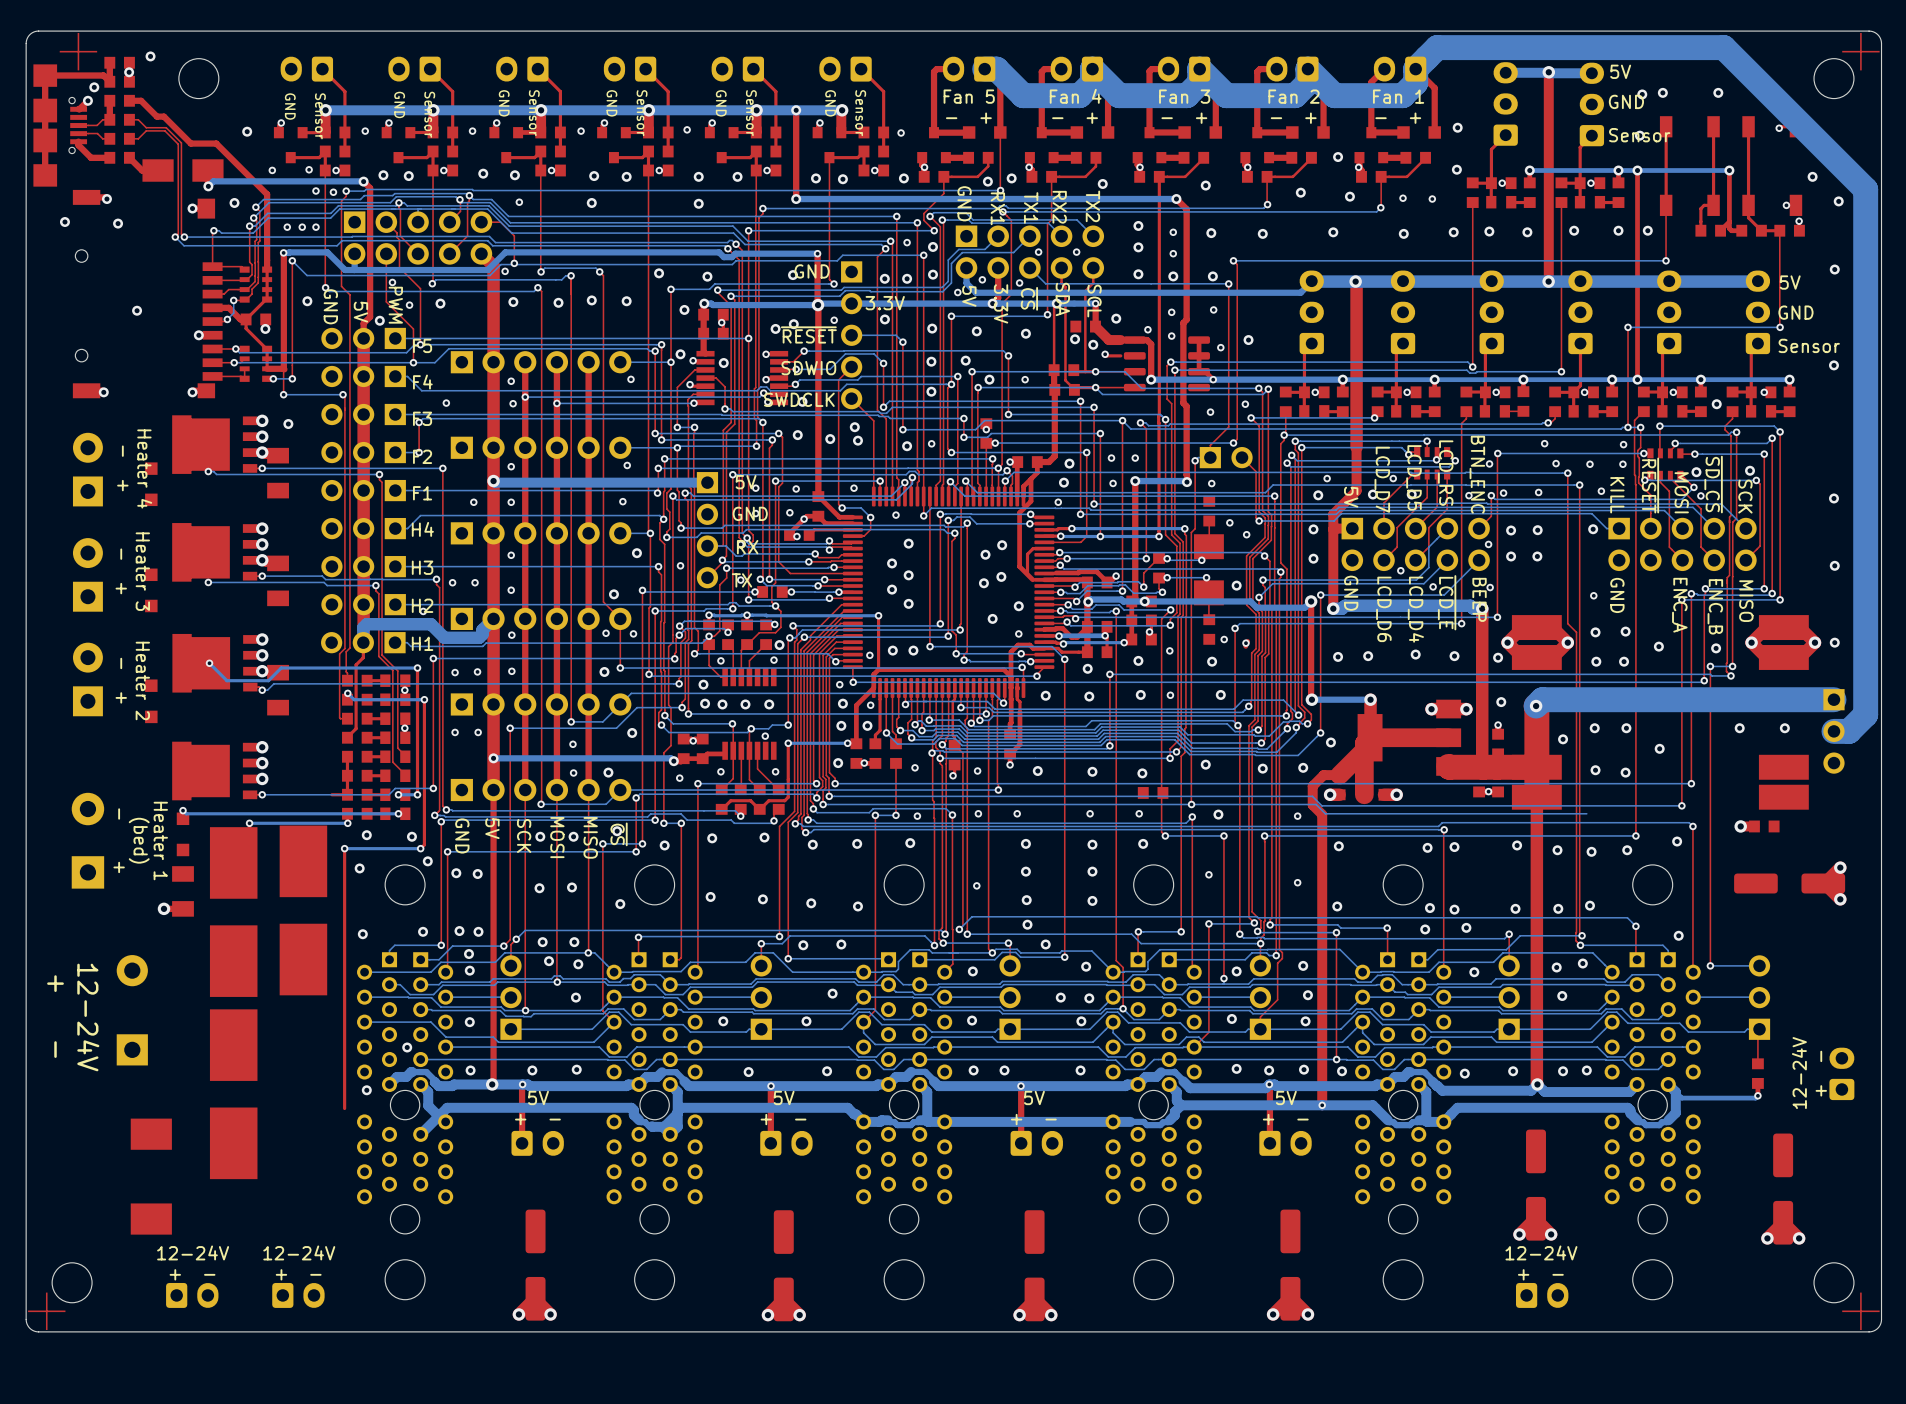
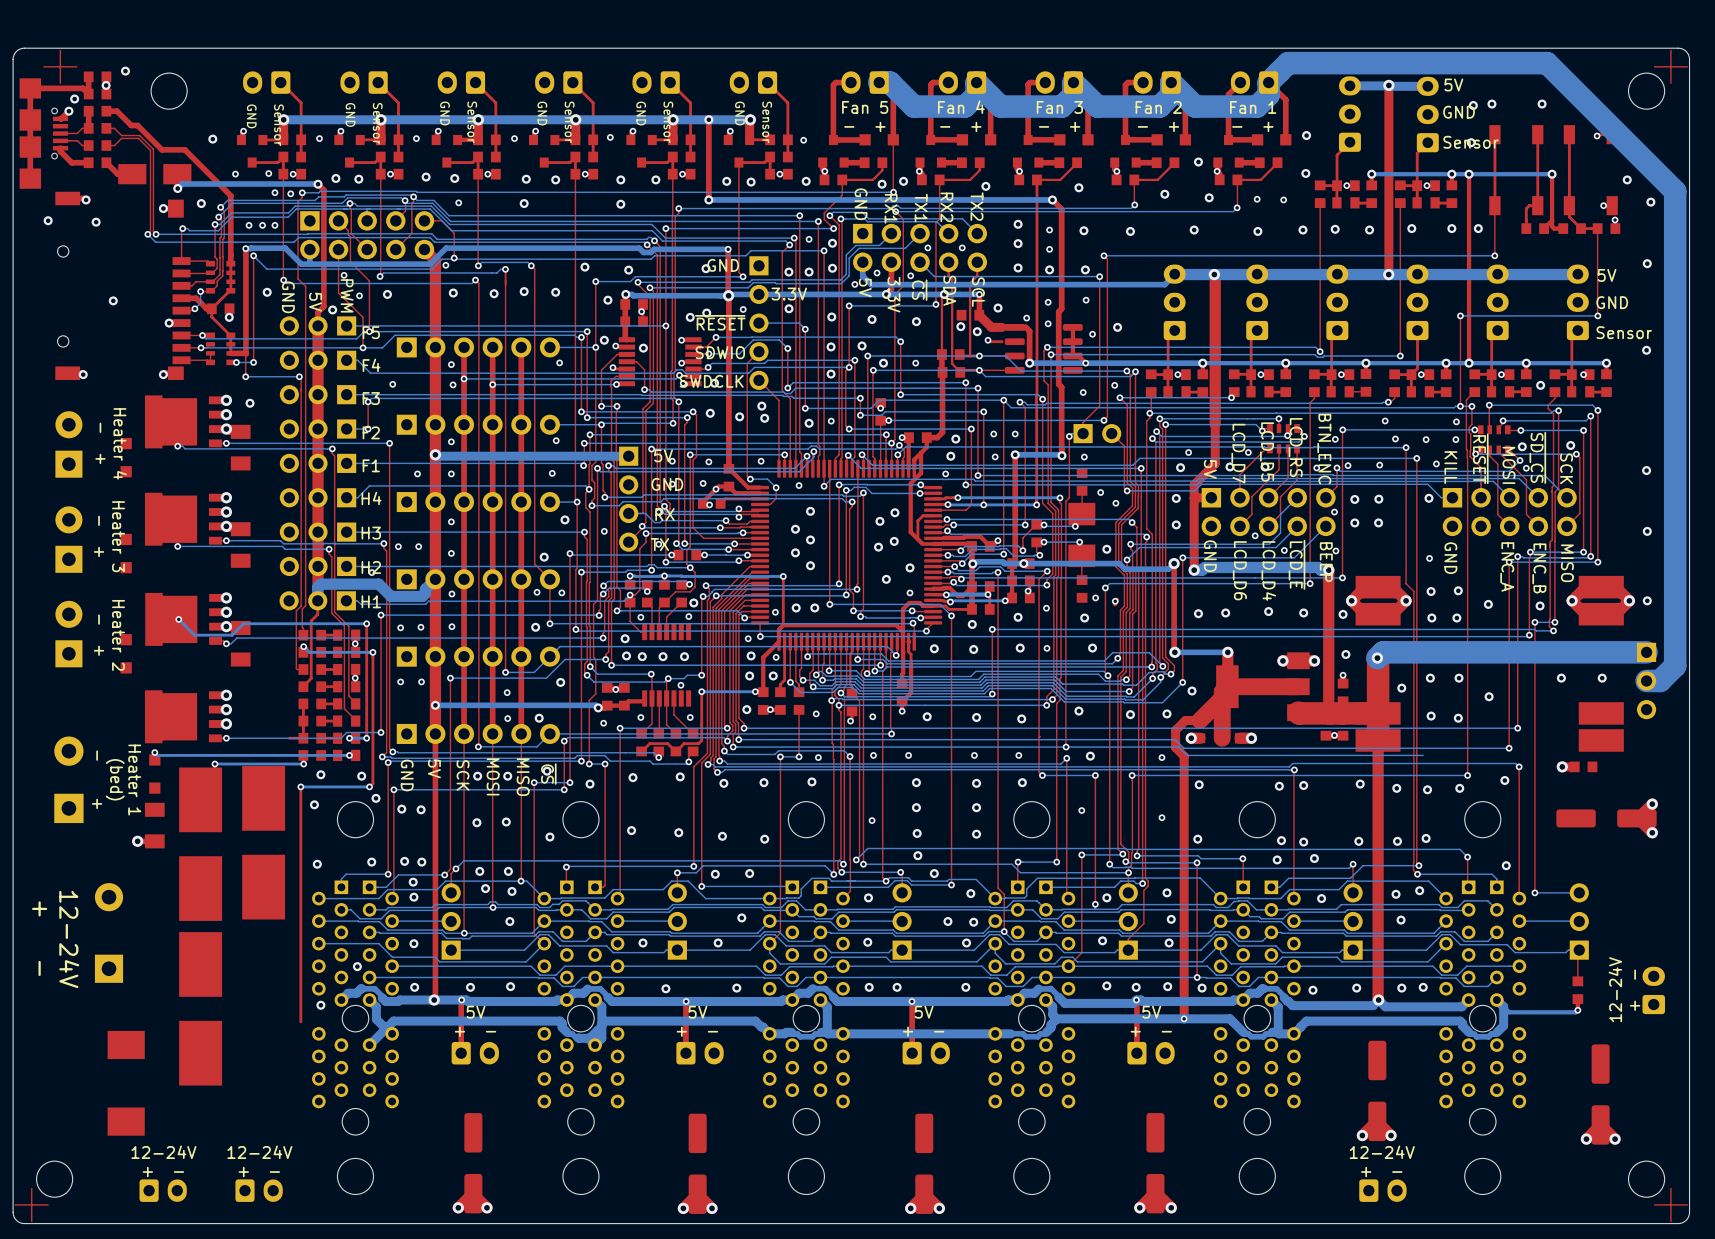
part: (1153, 792) -> none

